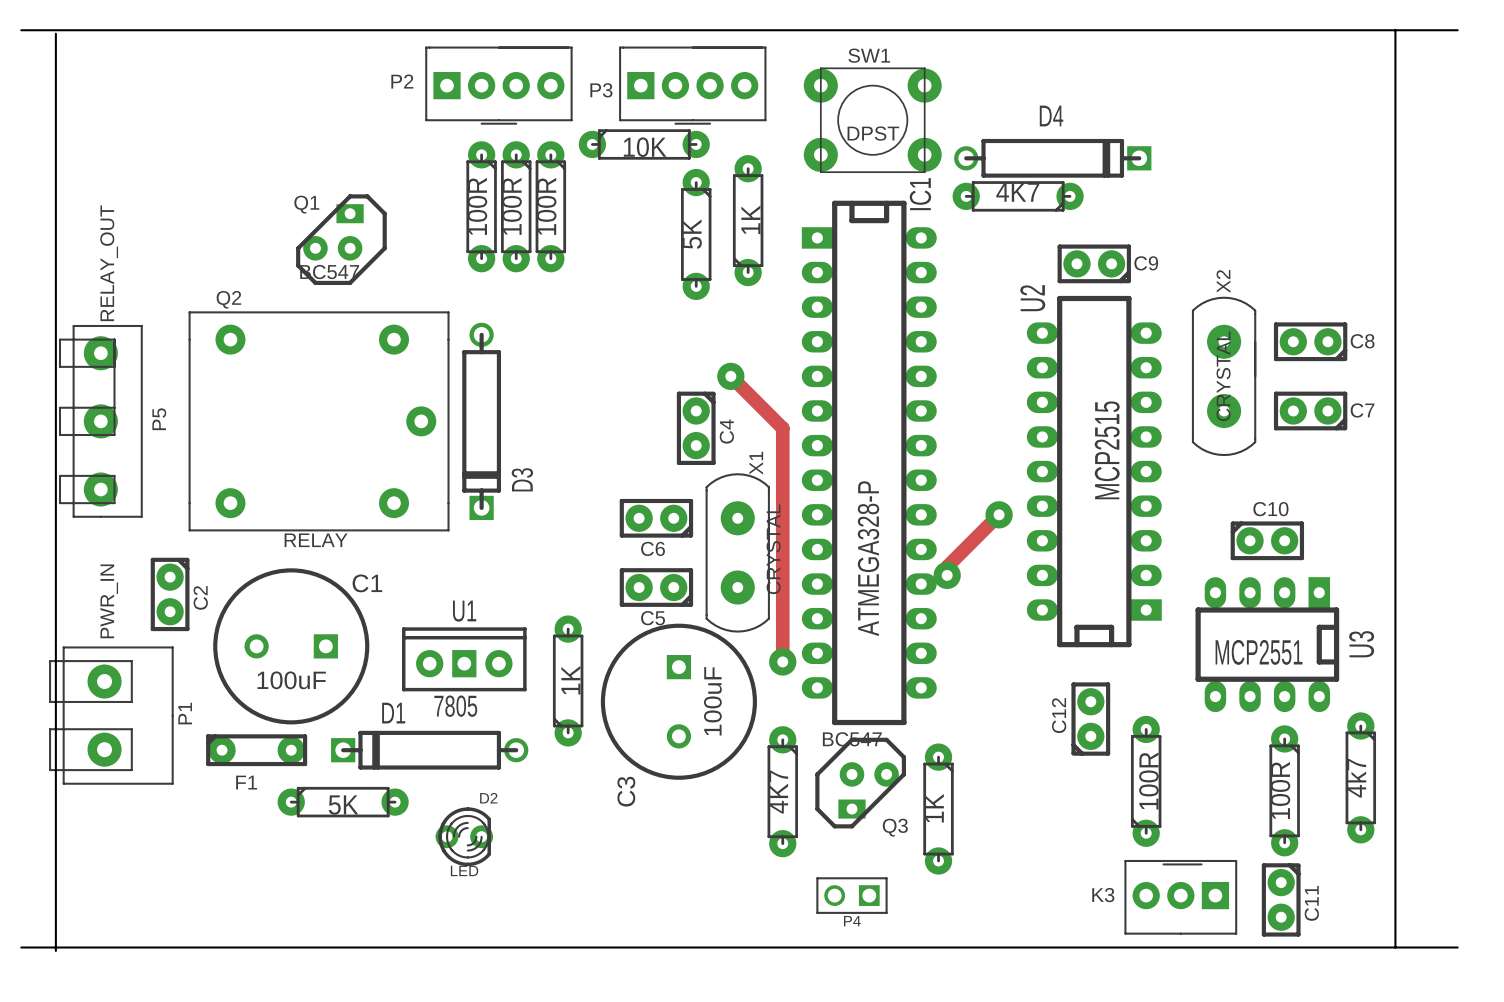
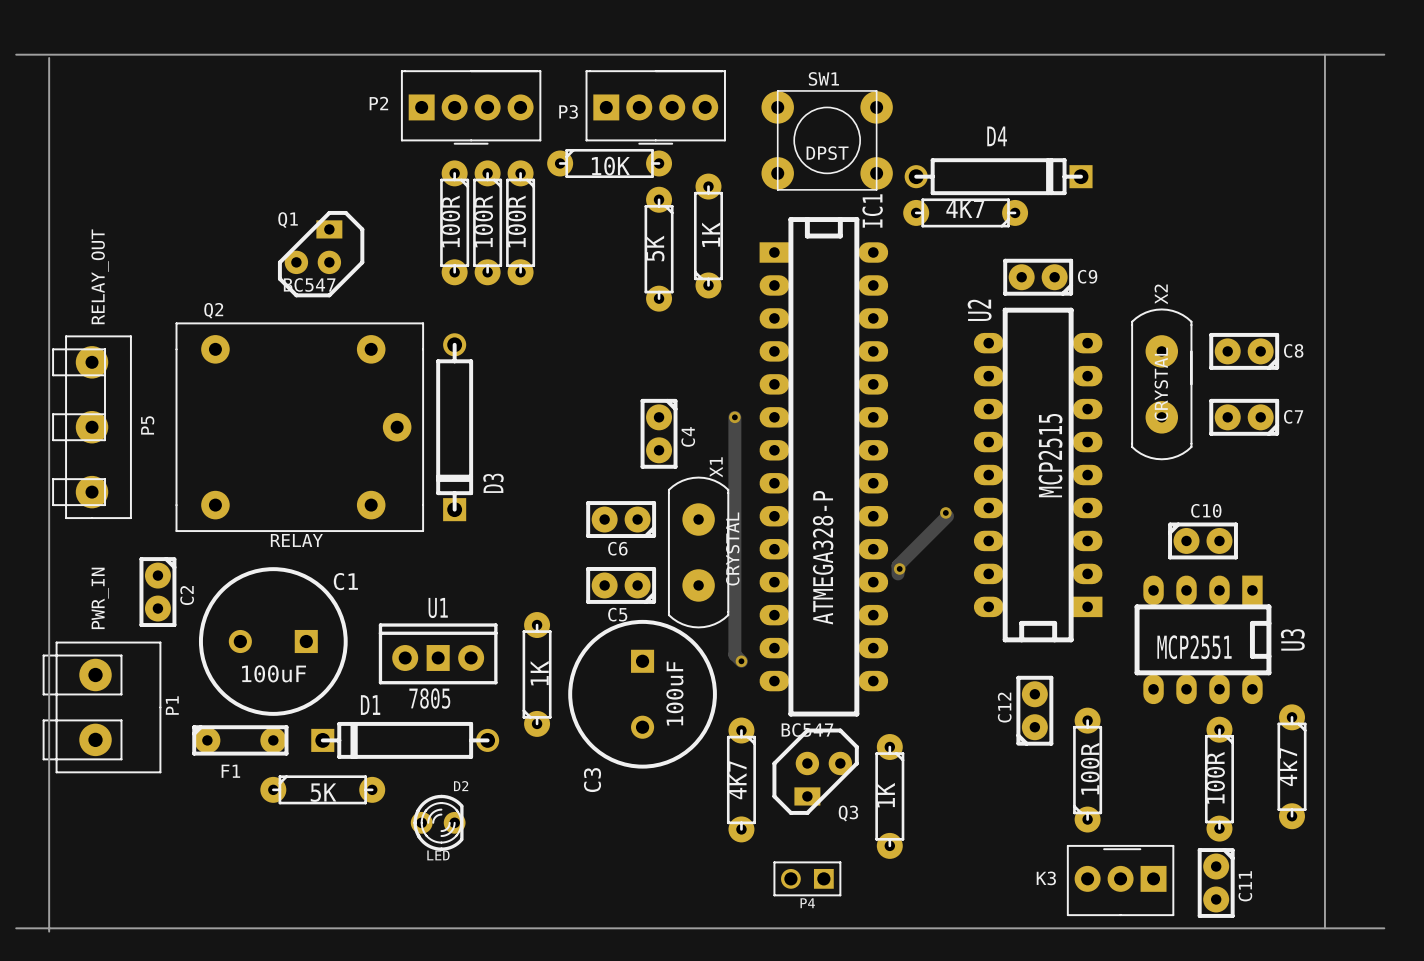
track: (730, 376) (782, 428) (782, 661) -> none
via: (730, 376) -> none
track: none -> (734, 417) (734, 654) (741, 661)
via: none -> (734, 417)
via size: [985, 501, 1013, 529] -> [940, 507, 952, 519]
via size: [933, 561, 961, 590] -> [893, 563, 906, 575]
via size: [769, 648, 797, 676] -> [735, 655, 748, 668]

